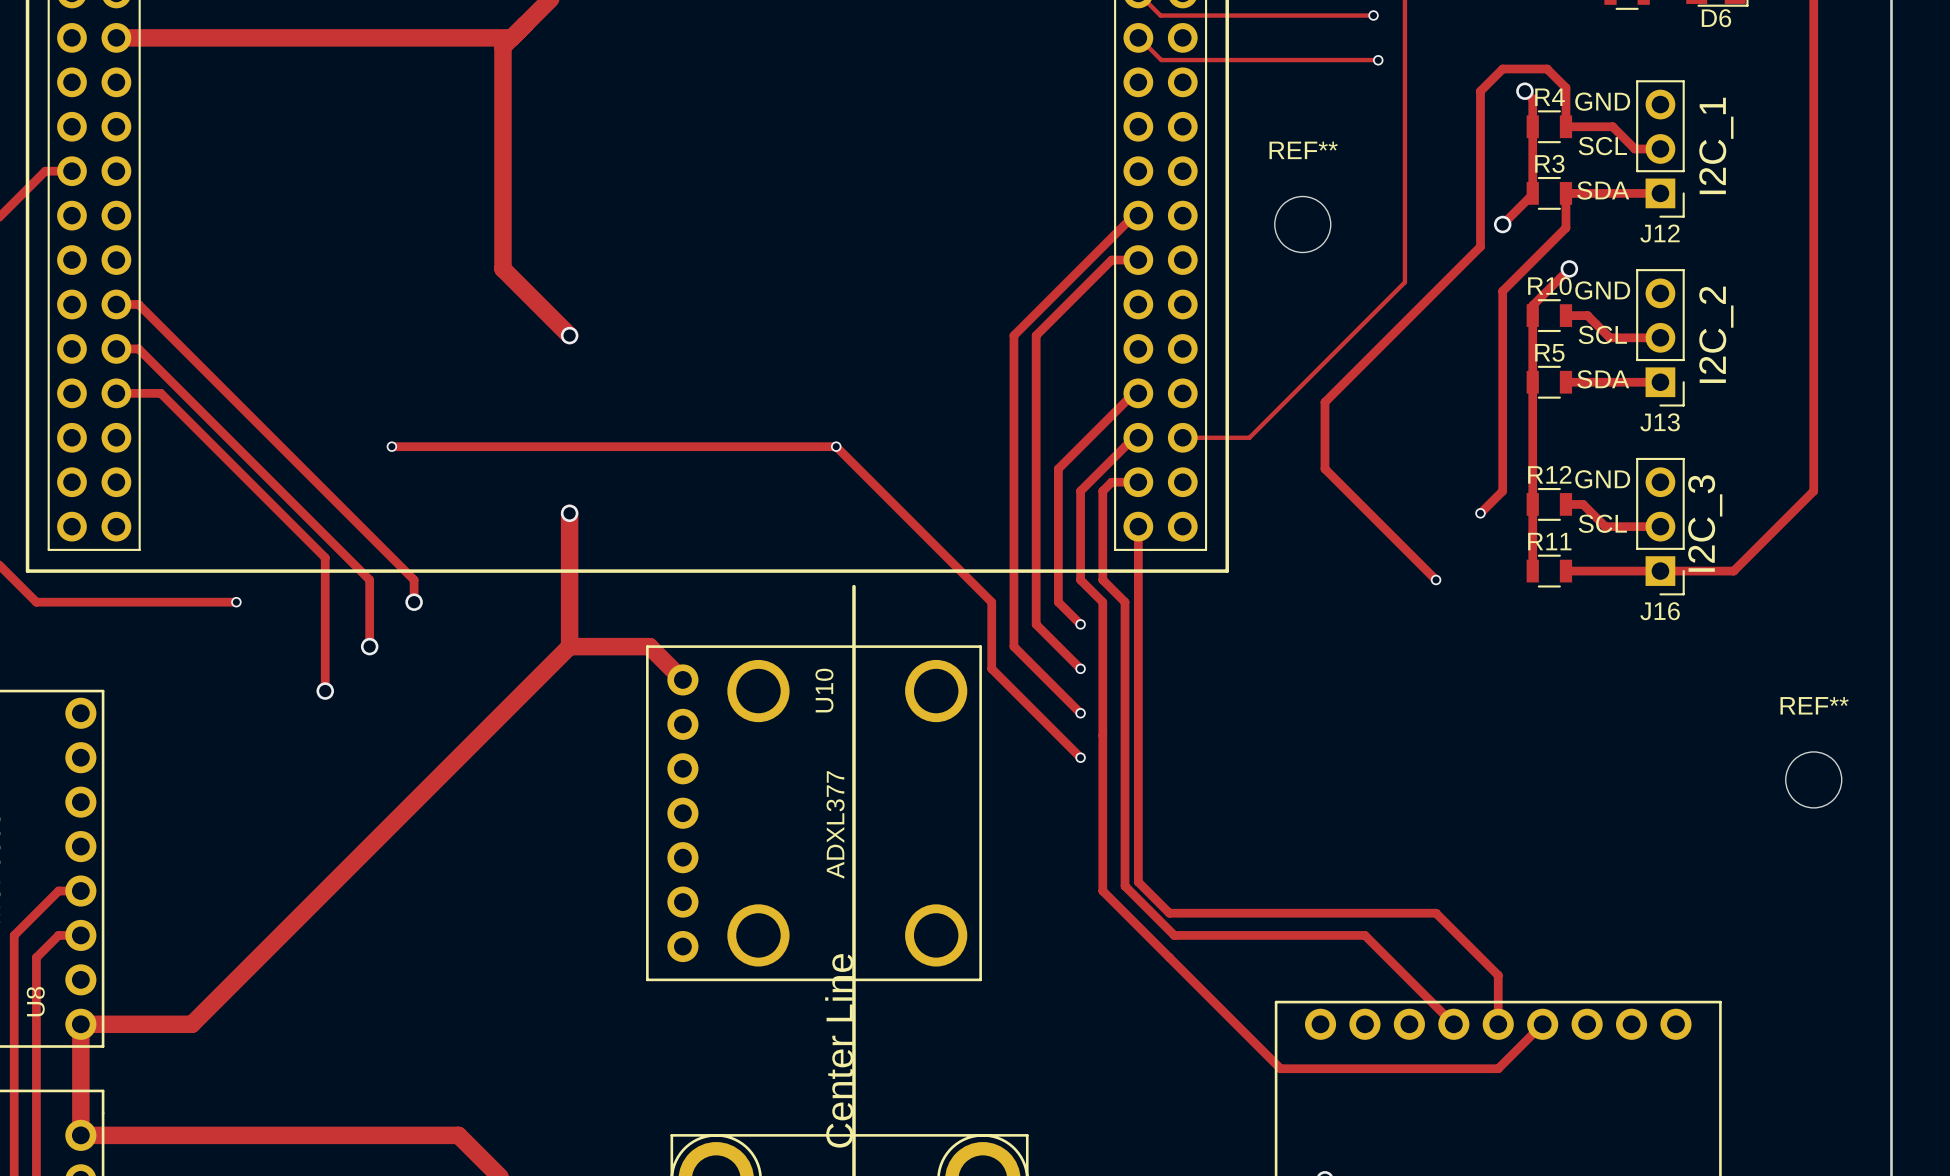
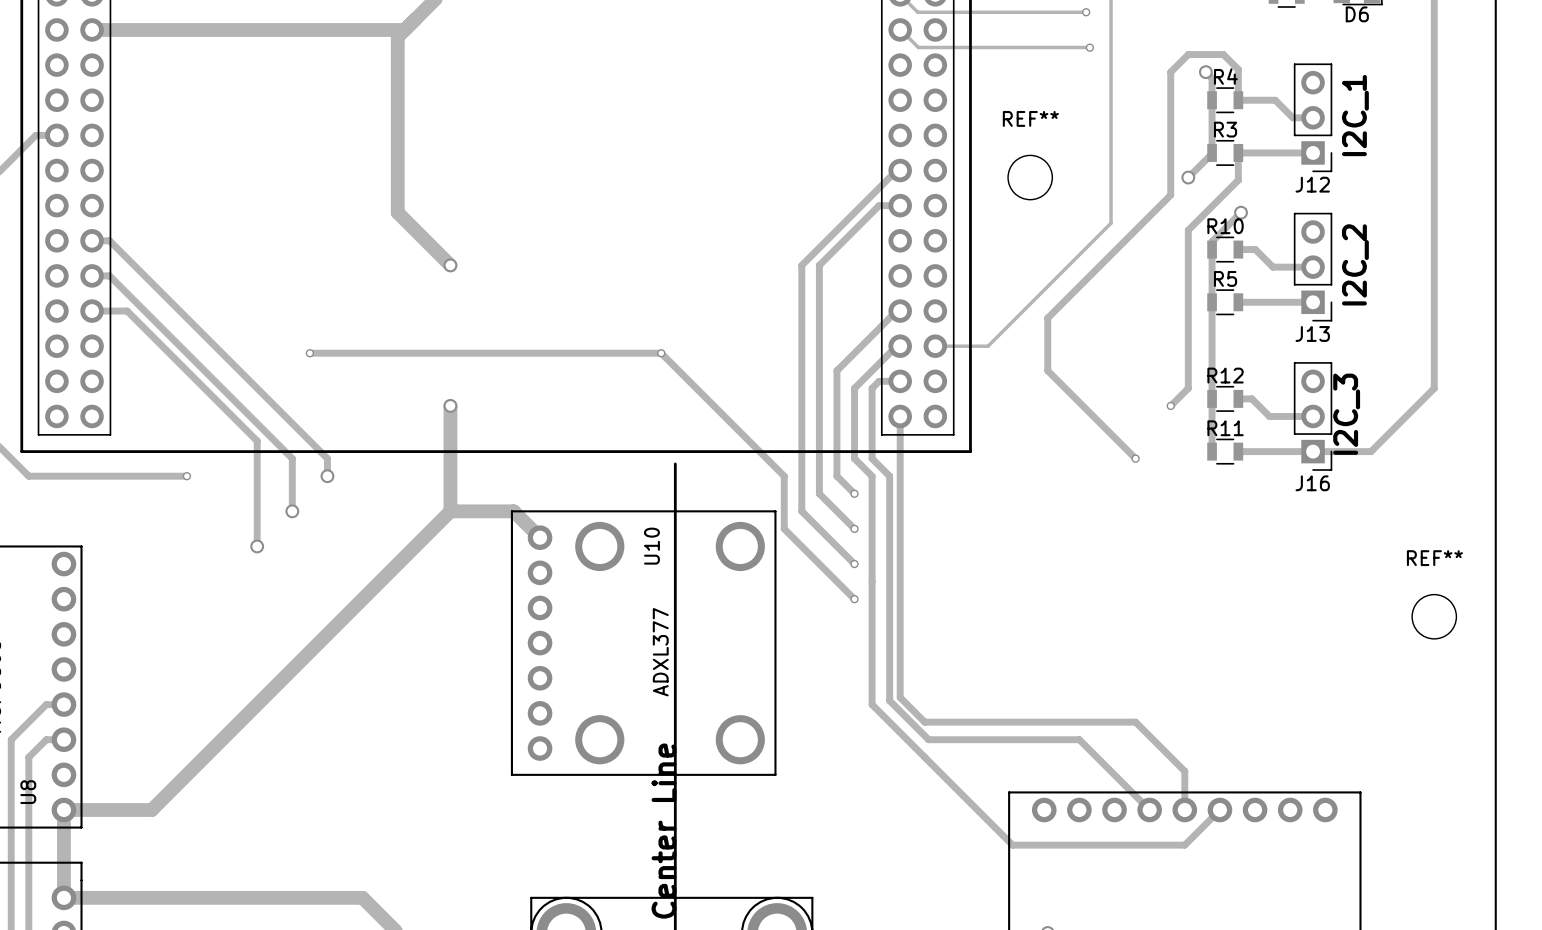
text: GND (1602, 101) -> none
text: SCL (1602, 146) -> none
text: SDA (1603, 190) -> none
text: GND (1602, 290) -> none
text: SCL (1602, 334) -> none
text: SDA (1603, 379) -> none
text: GND (1602, 479) -> none
text: SCL (1602, 523) -> none

